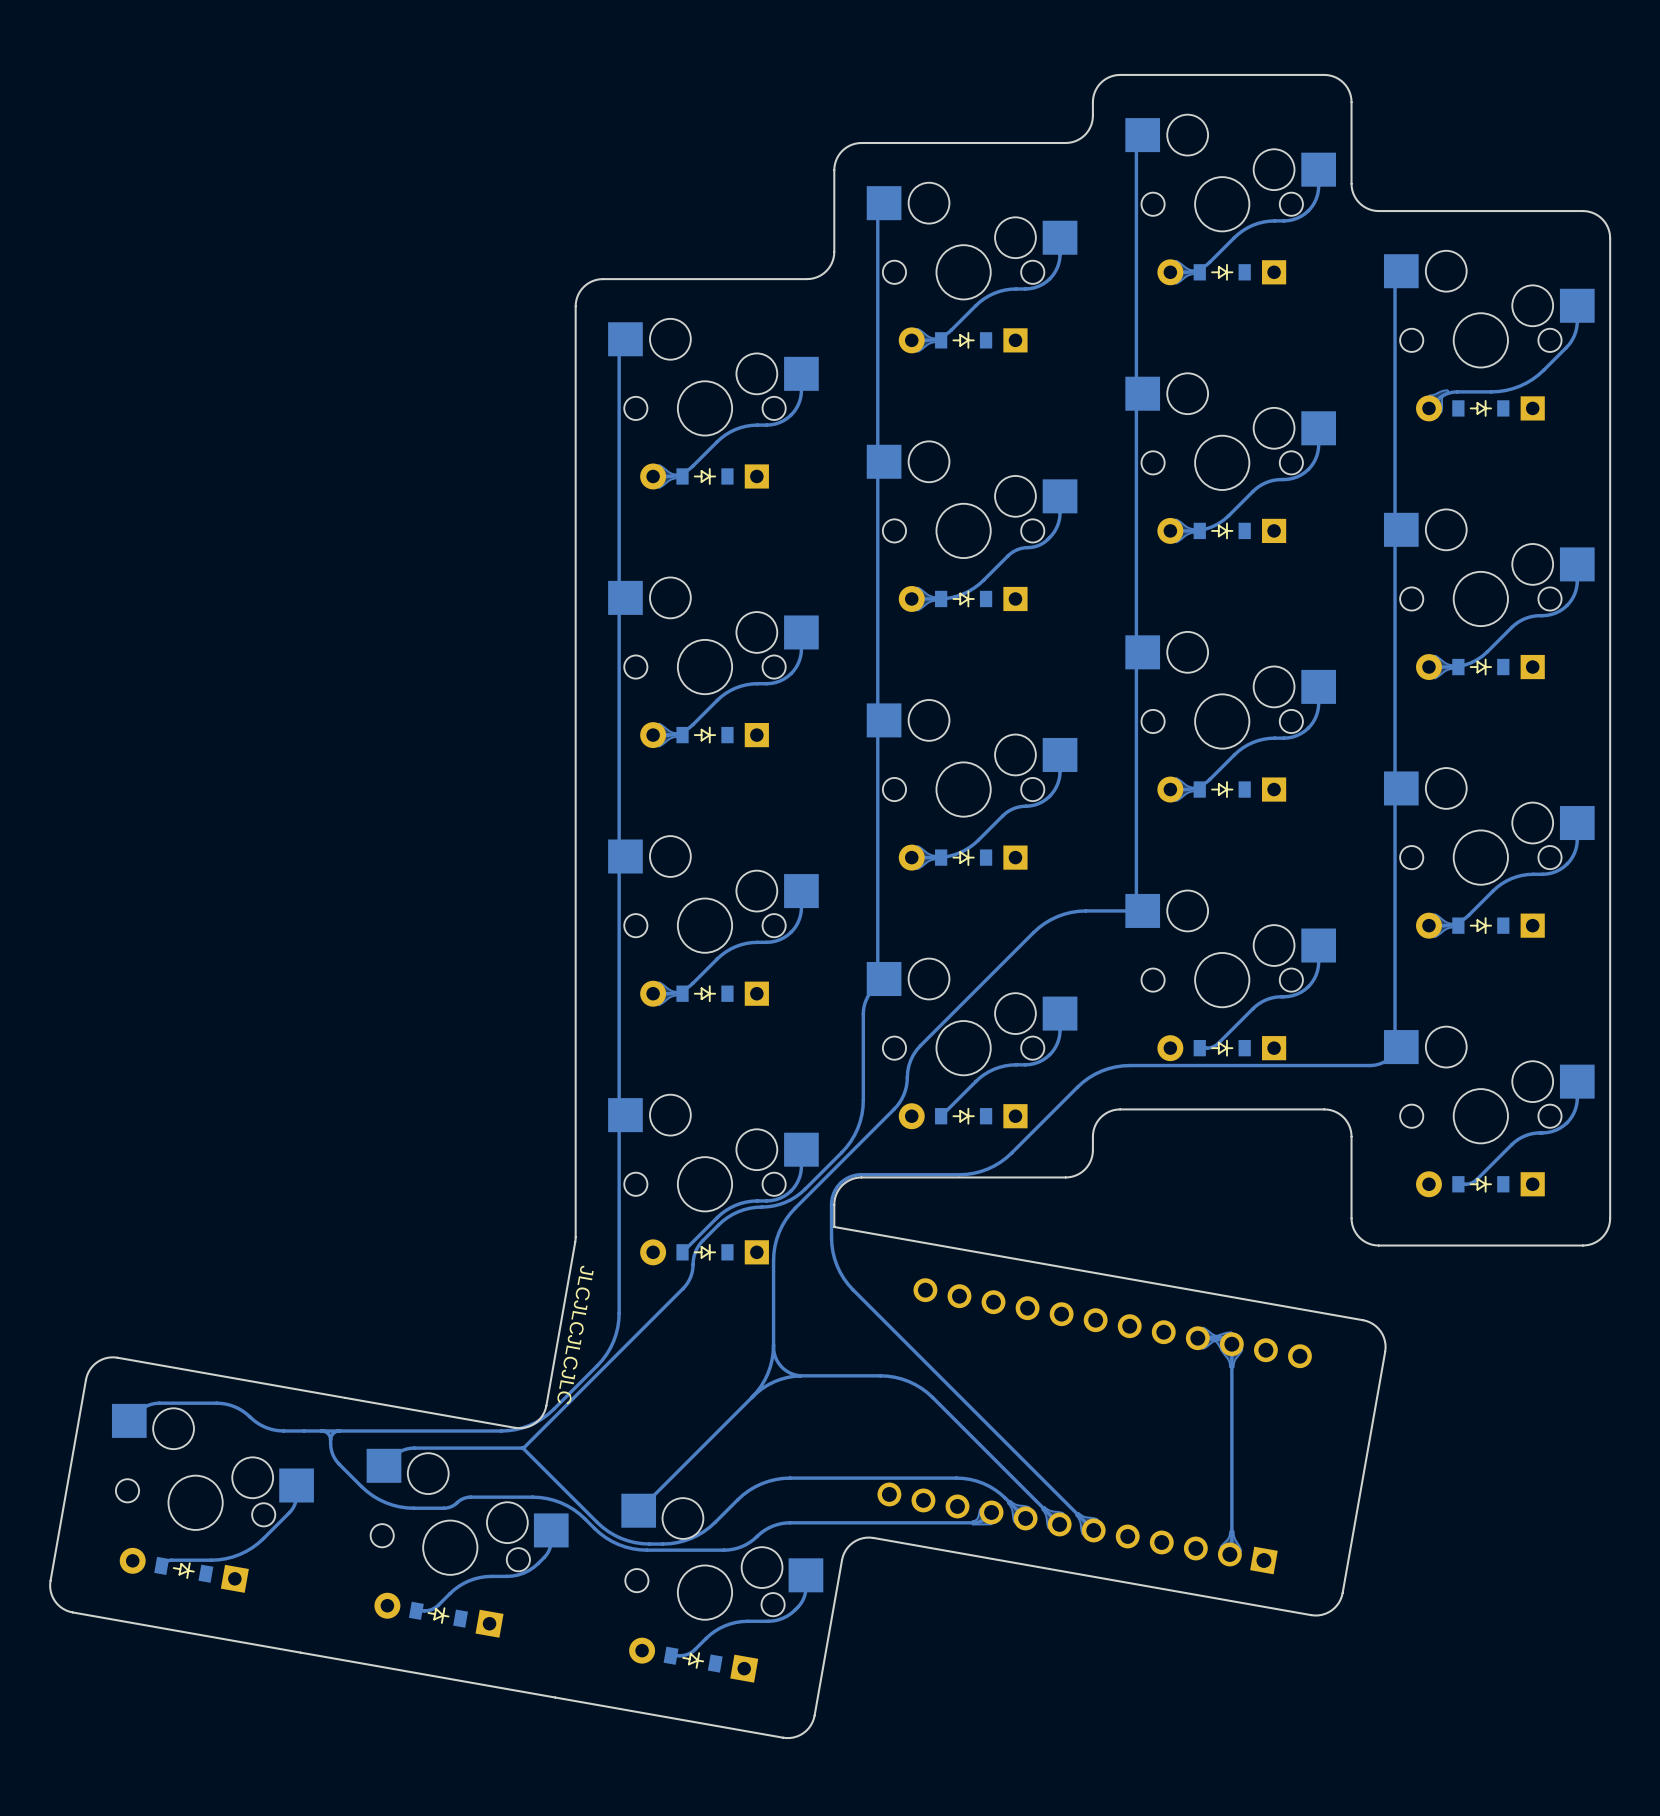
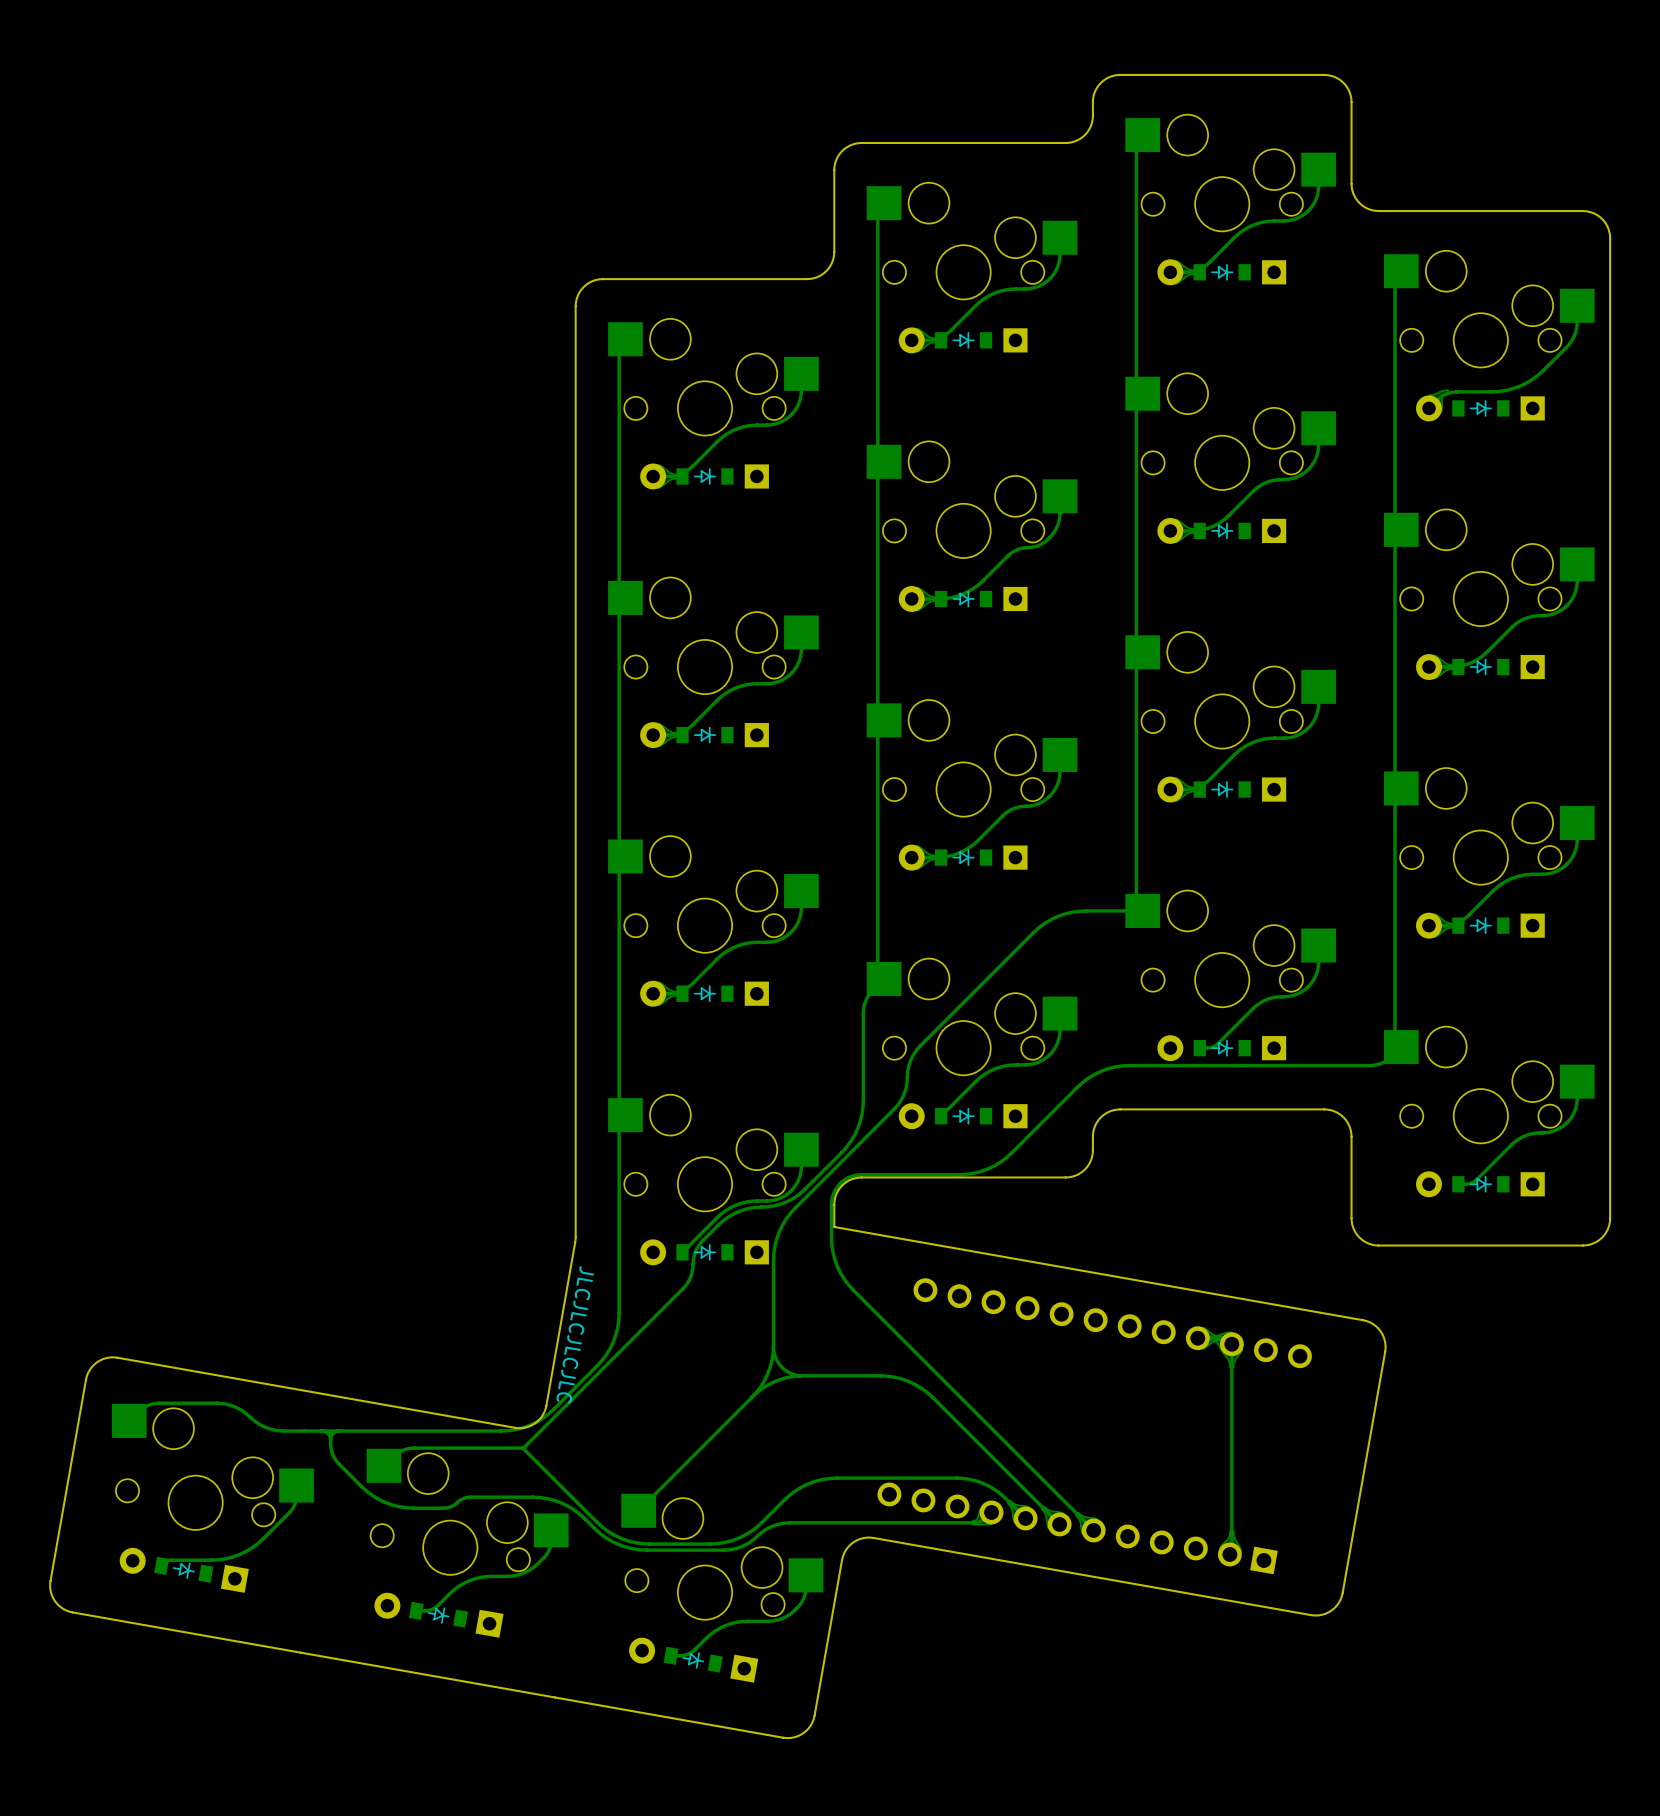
track: (837, 1478) (782, 1478) (761, 1483) (743, 1494) (703, 1531) (684, 1540) (662, 1544) -> (837, 1478) (815, 1481) (795, 1490) (756, 1527) (738, 1538) (717, 1543) (662, 1544)

